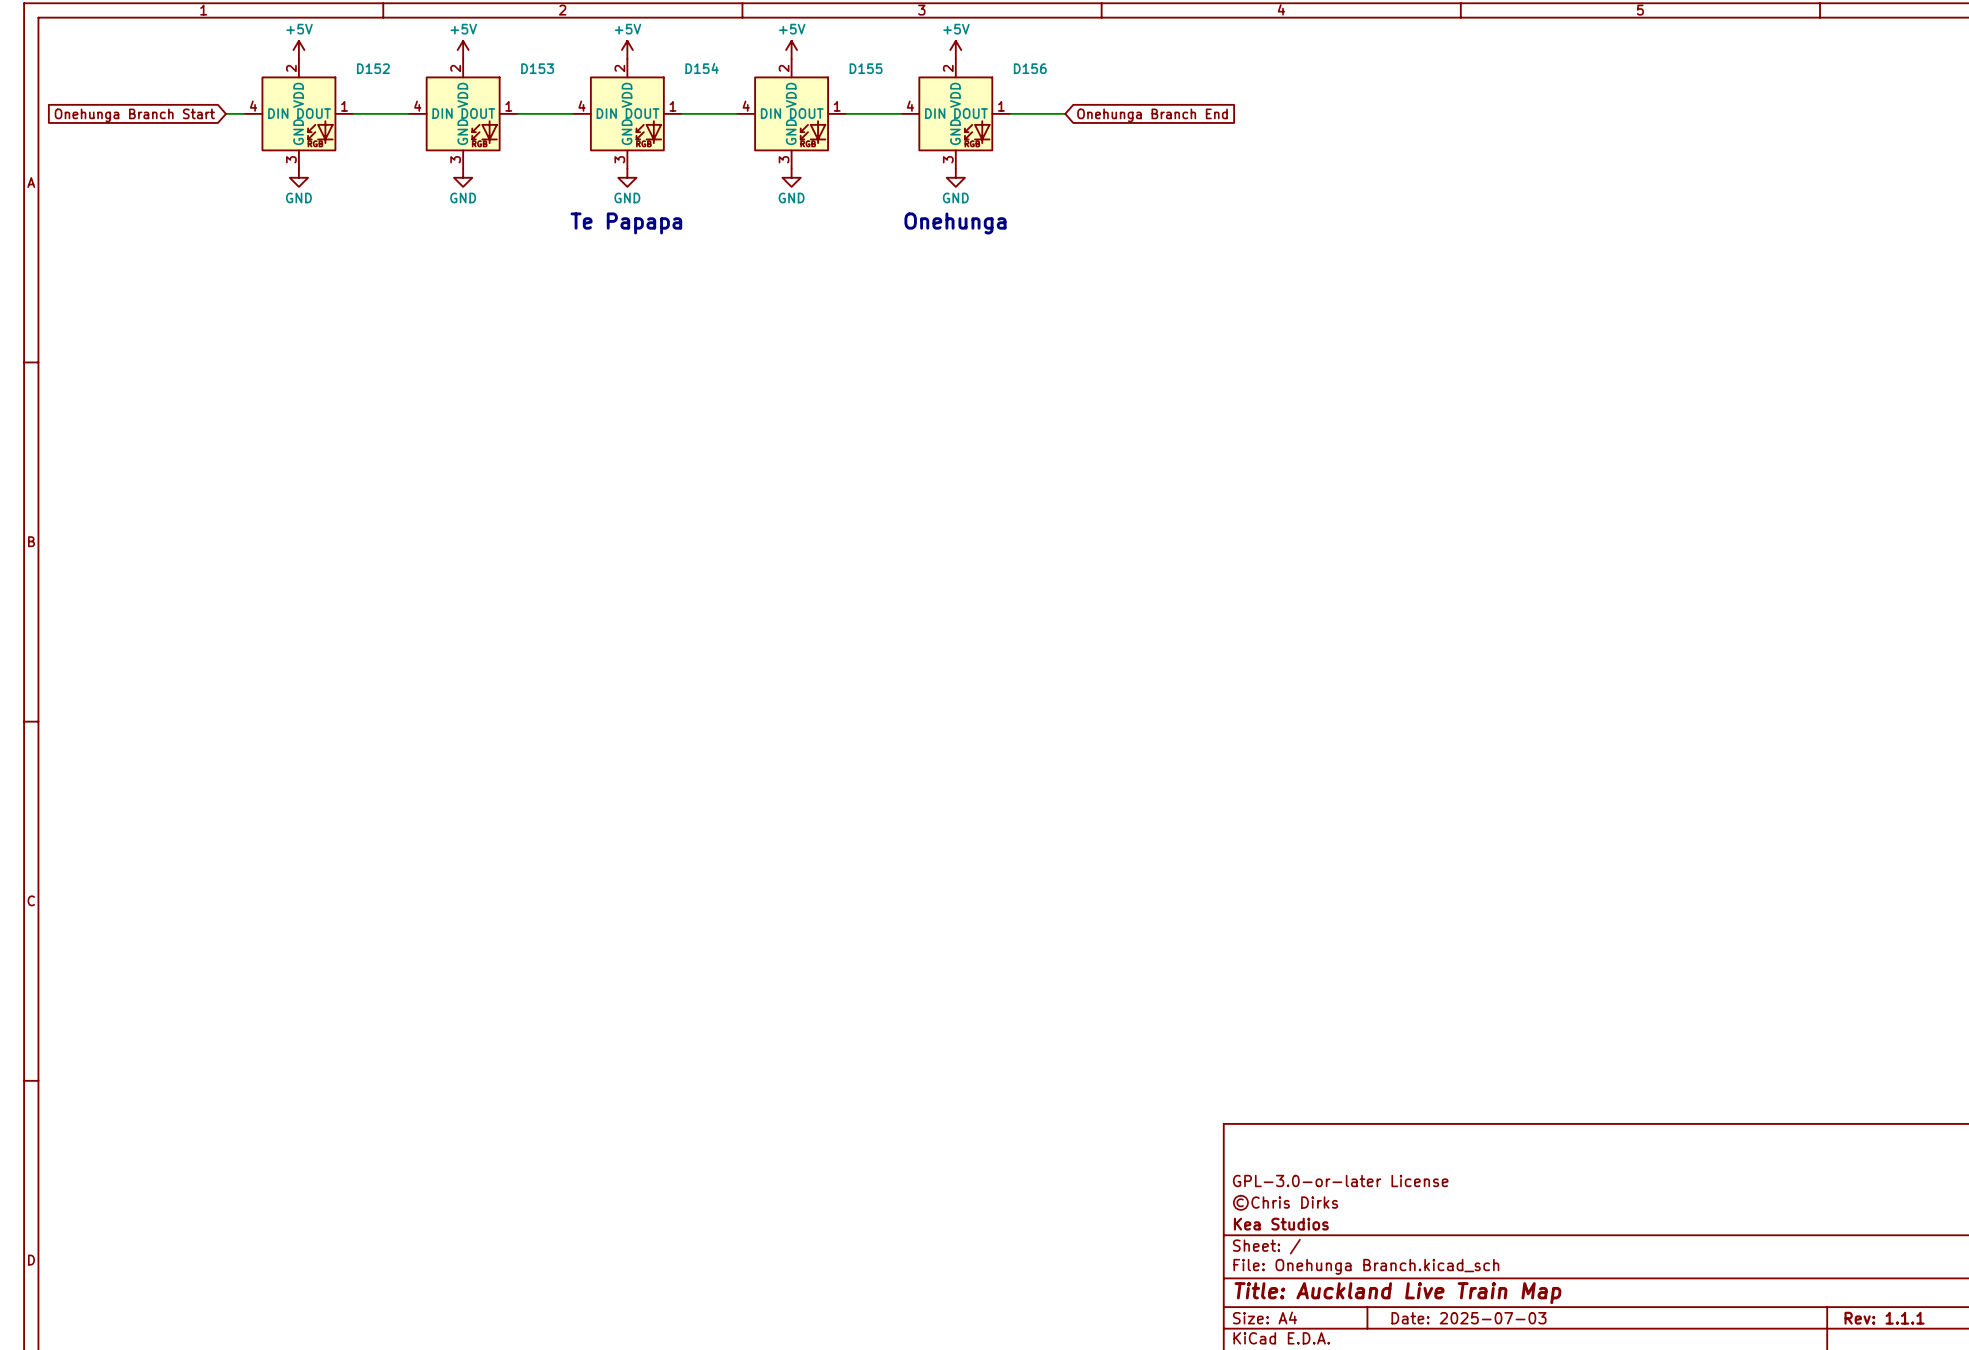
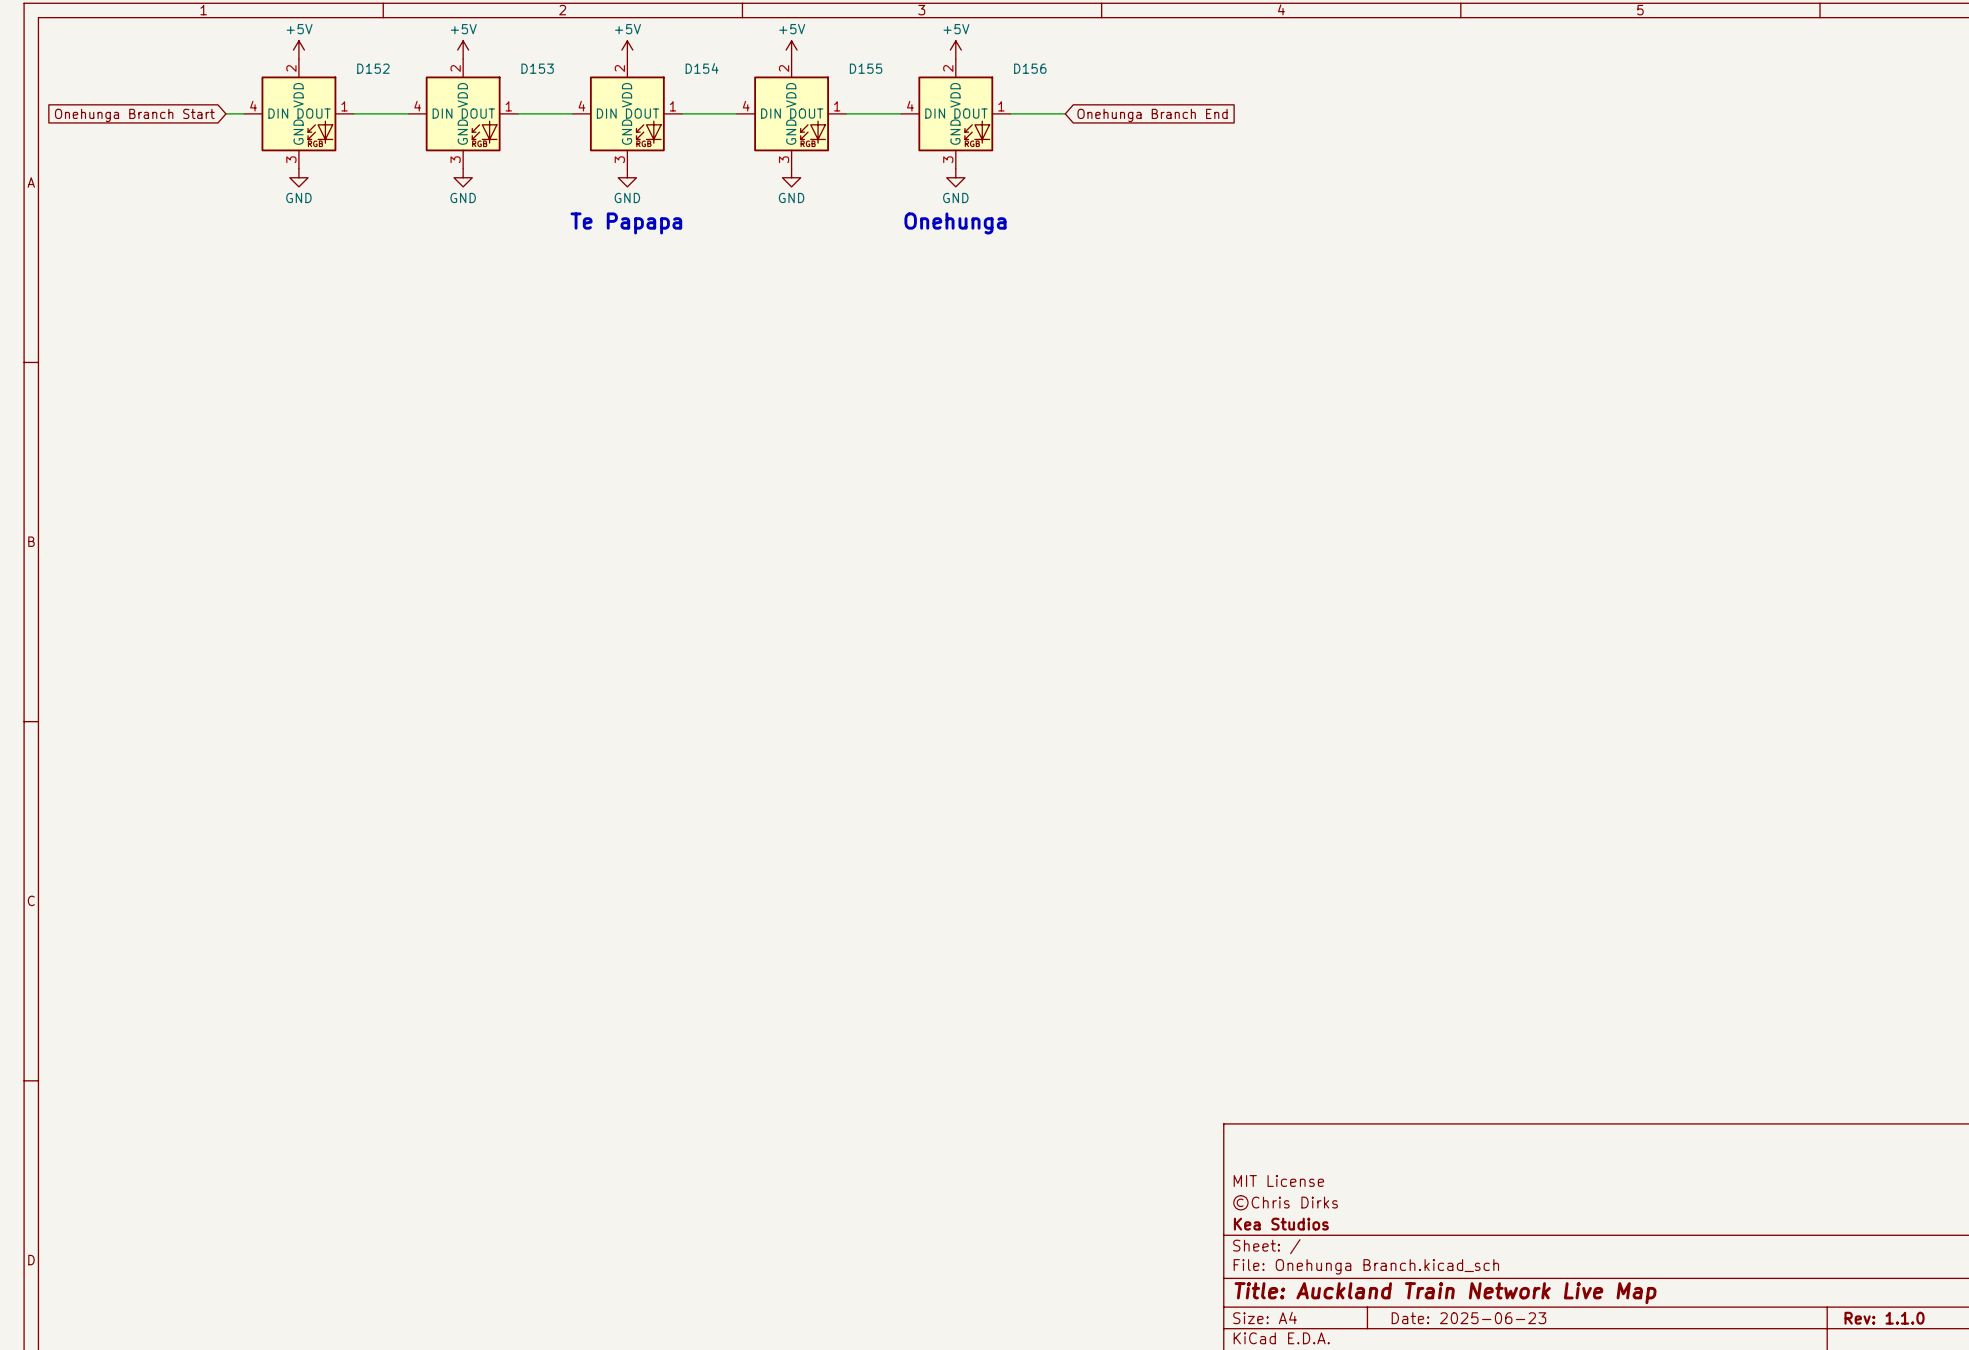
title block: GPL-3.0-or-later License (1340, 1181) -> MIT License (1278, 1181)
title block: Title: Auckland Live Train Map (1398, 1293) -> Title: Auckland Train Network Live Map (1445, 1293)
title block: Date: 2025-07-03 (1468, 1318) -> Date: 2025-06-23 (1468, 1318)
title block: Rev: 1.1.1 (1884, 1318) -> Rev: 1.1.0 (1884, 1318)

